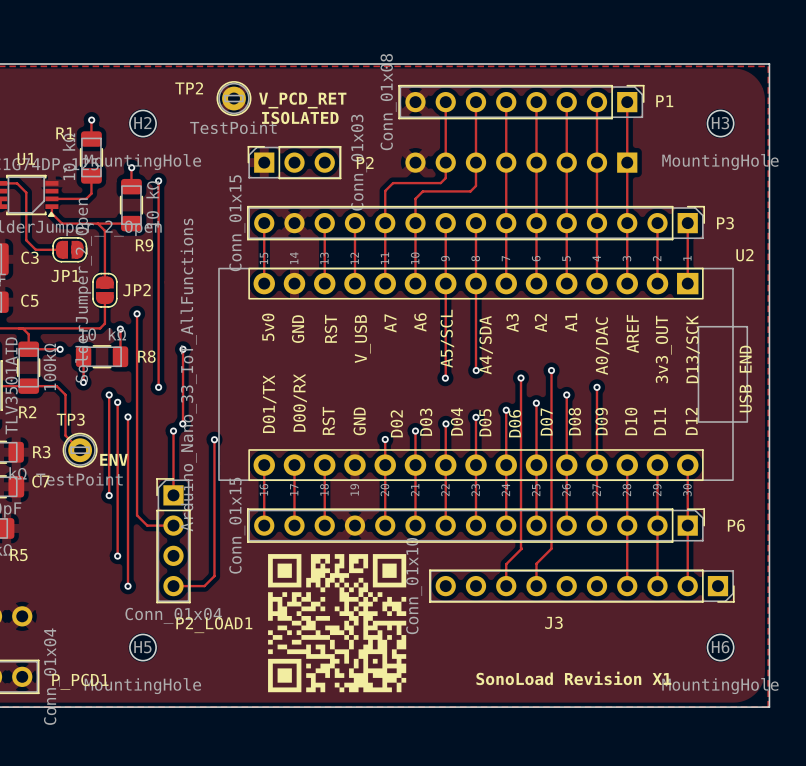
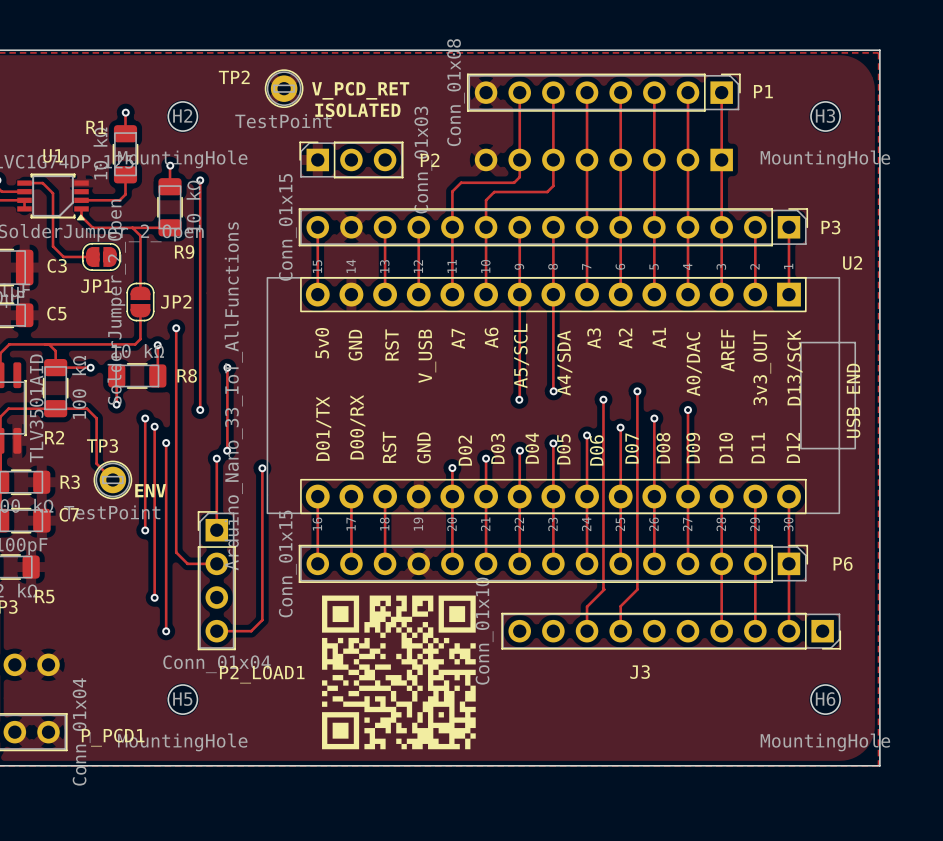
R2 value: 100kΩ (49, 367) -> 100 kΩ (79, 387)
text: SonoLoad Revision X1 (573, 678) -> none

